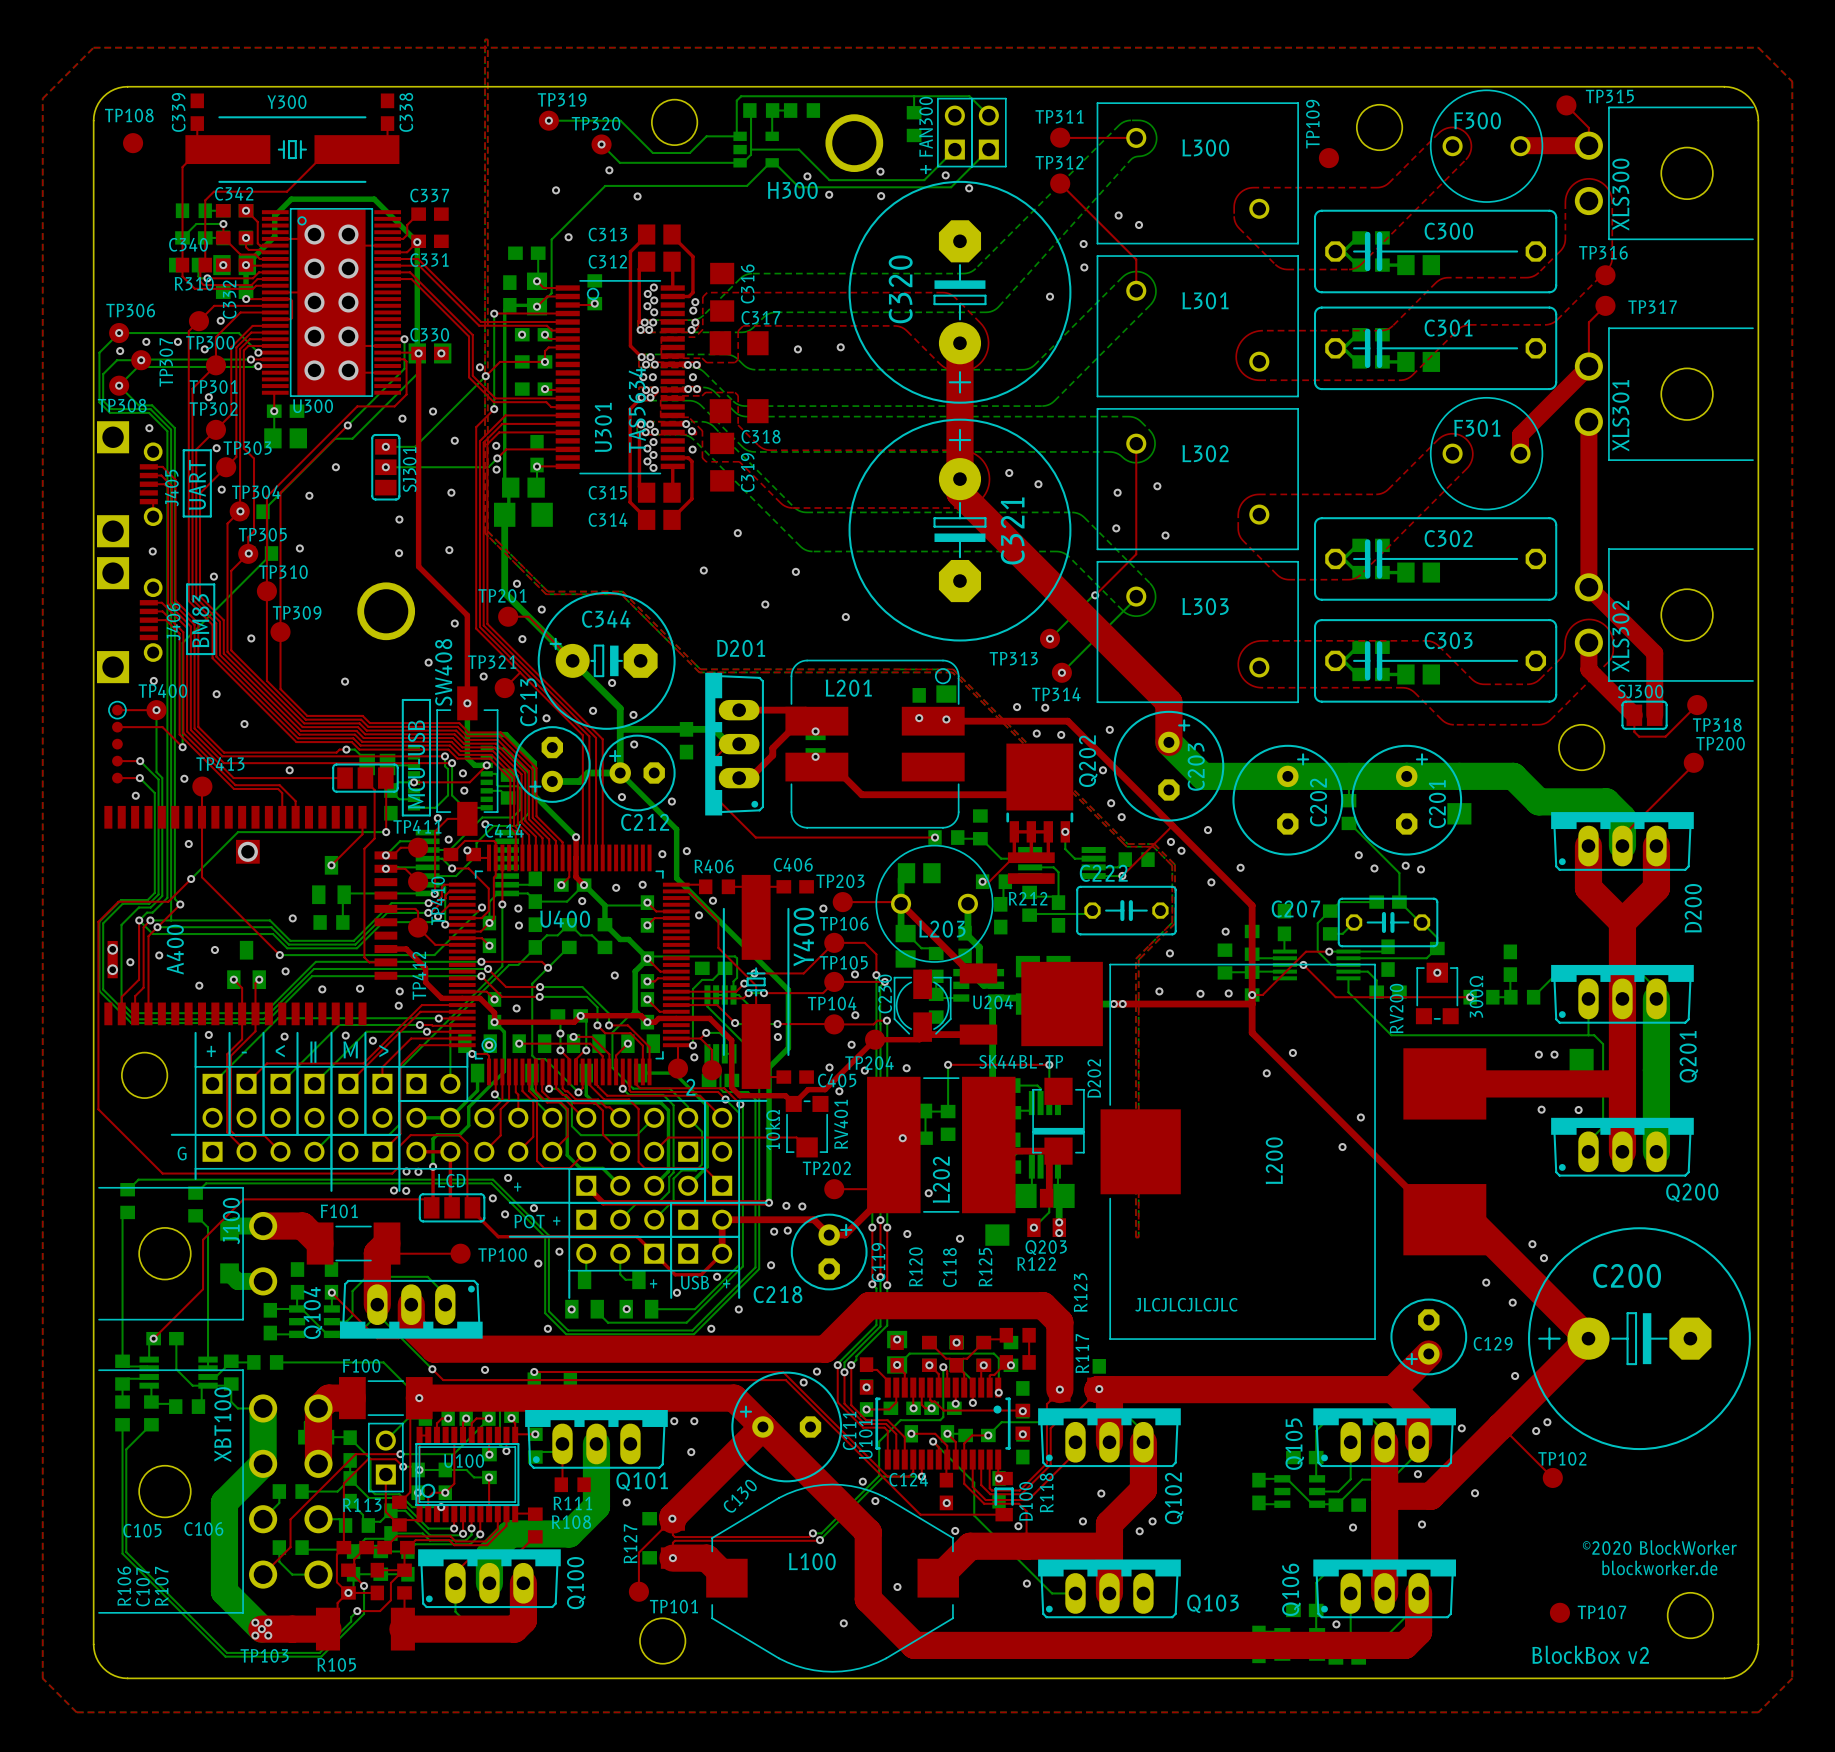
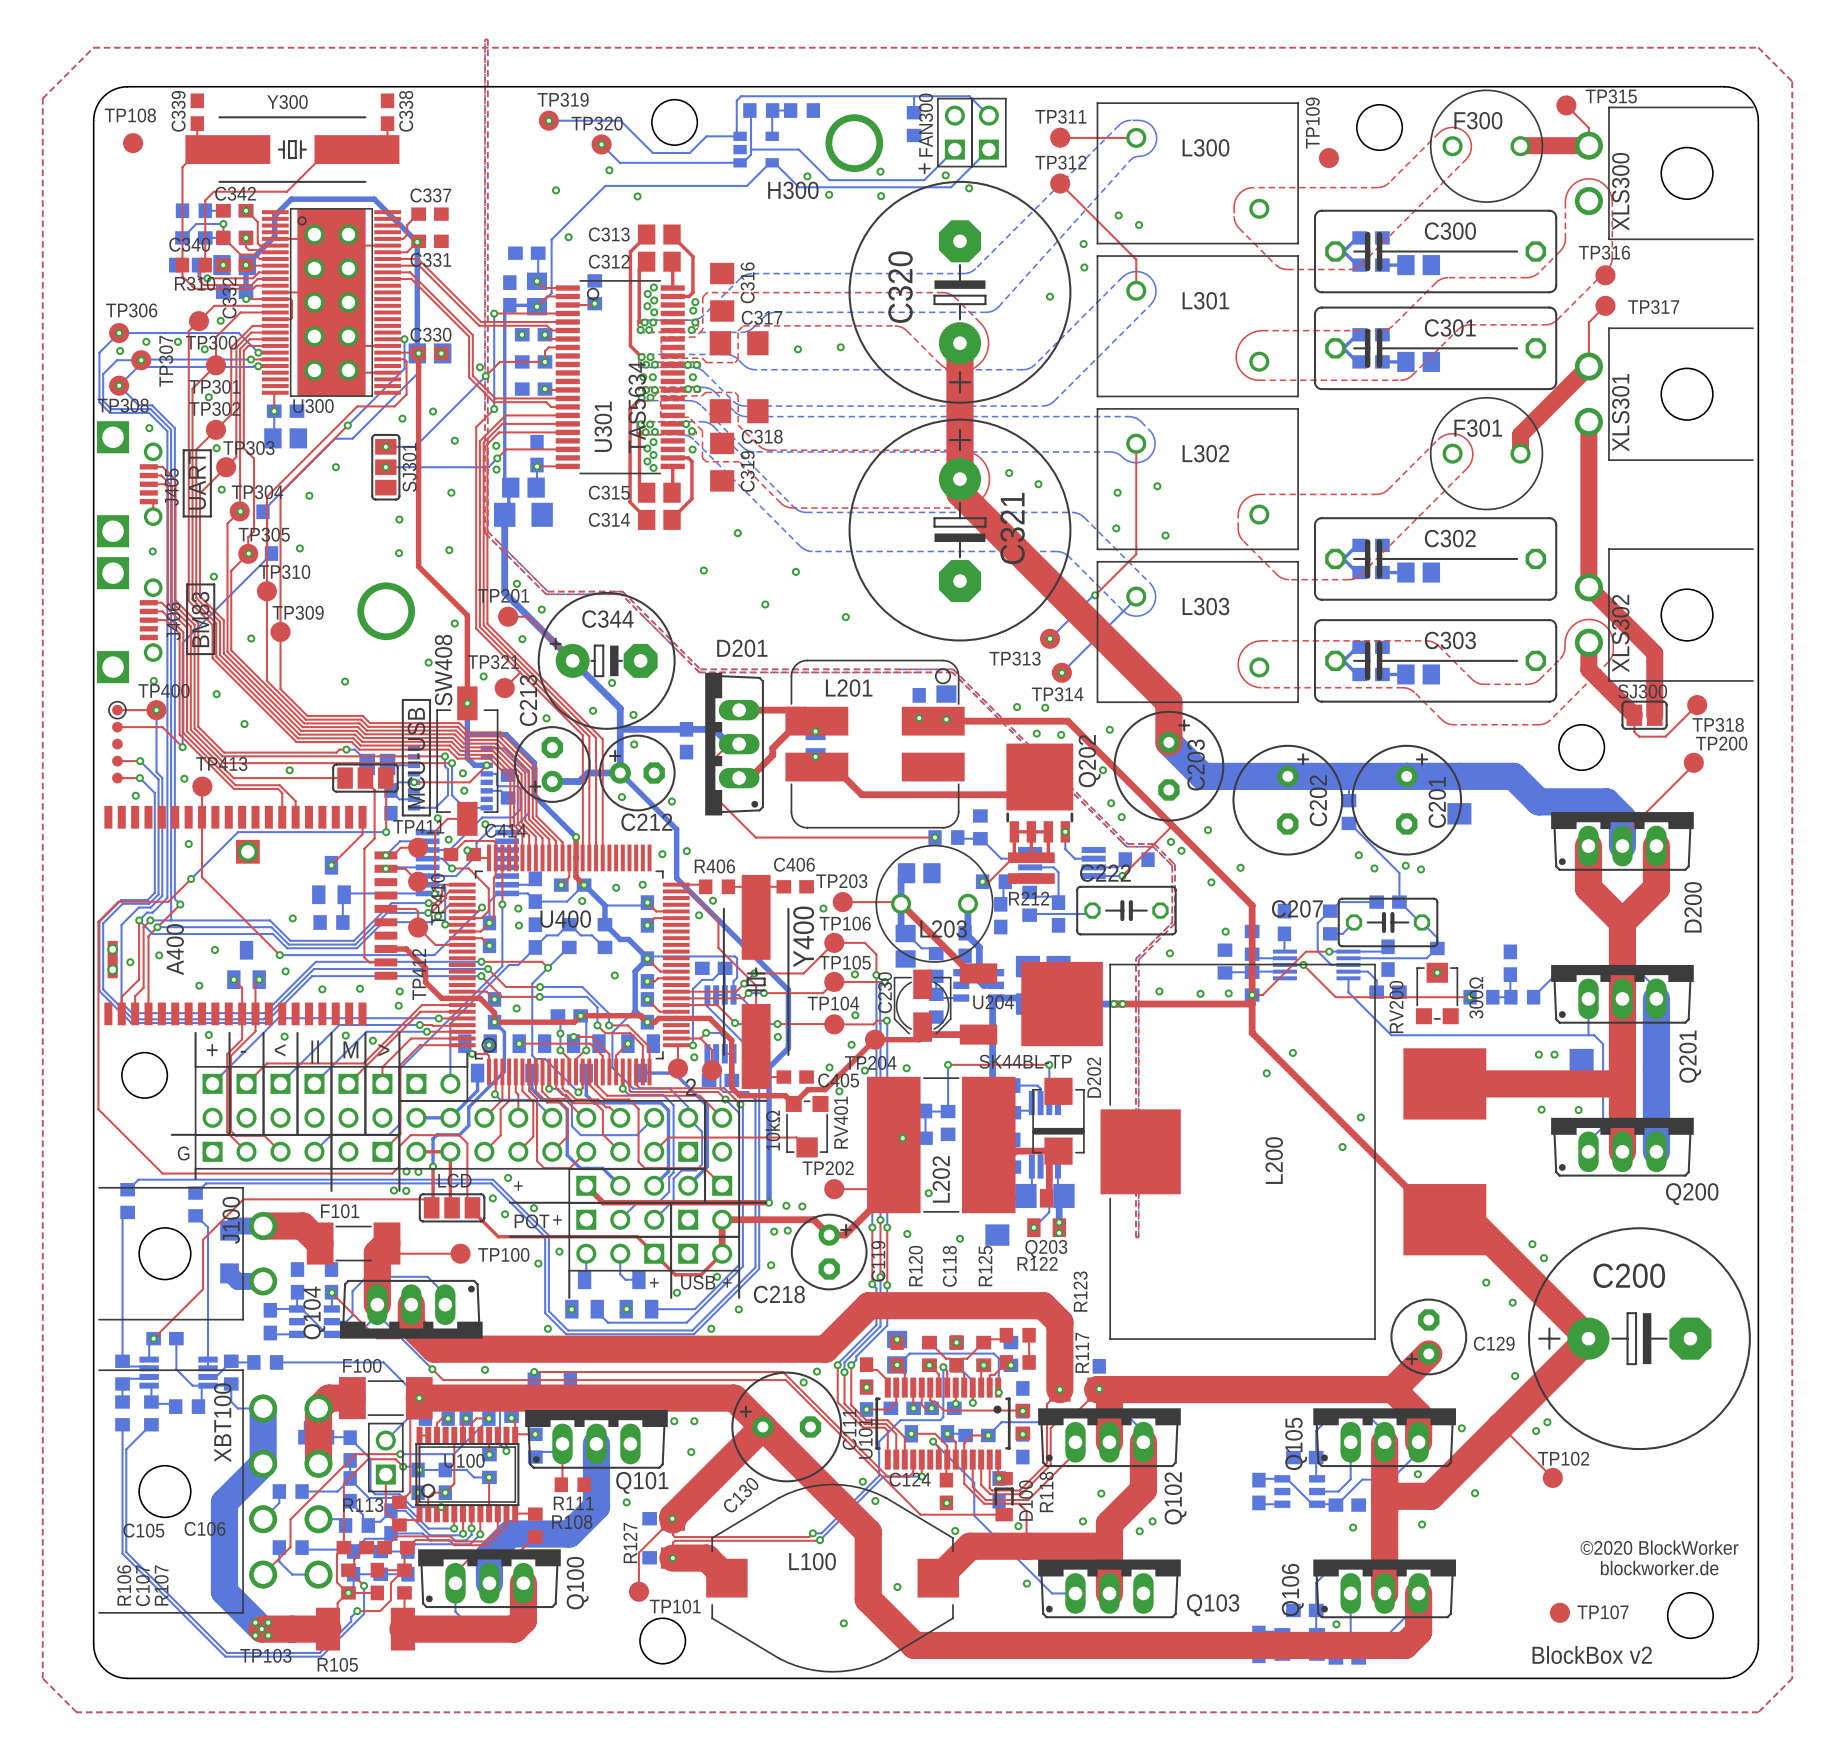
text: JLCJLCJLCJLC (1186, 1304) -> none

